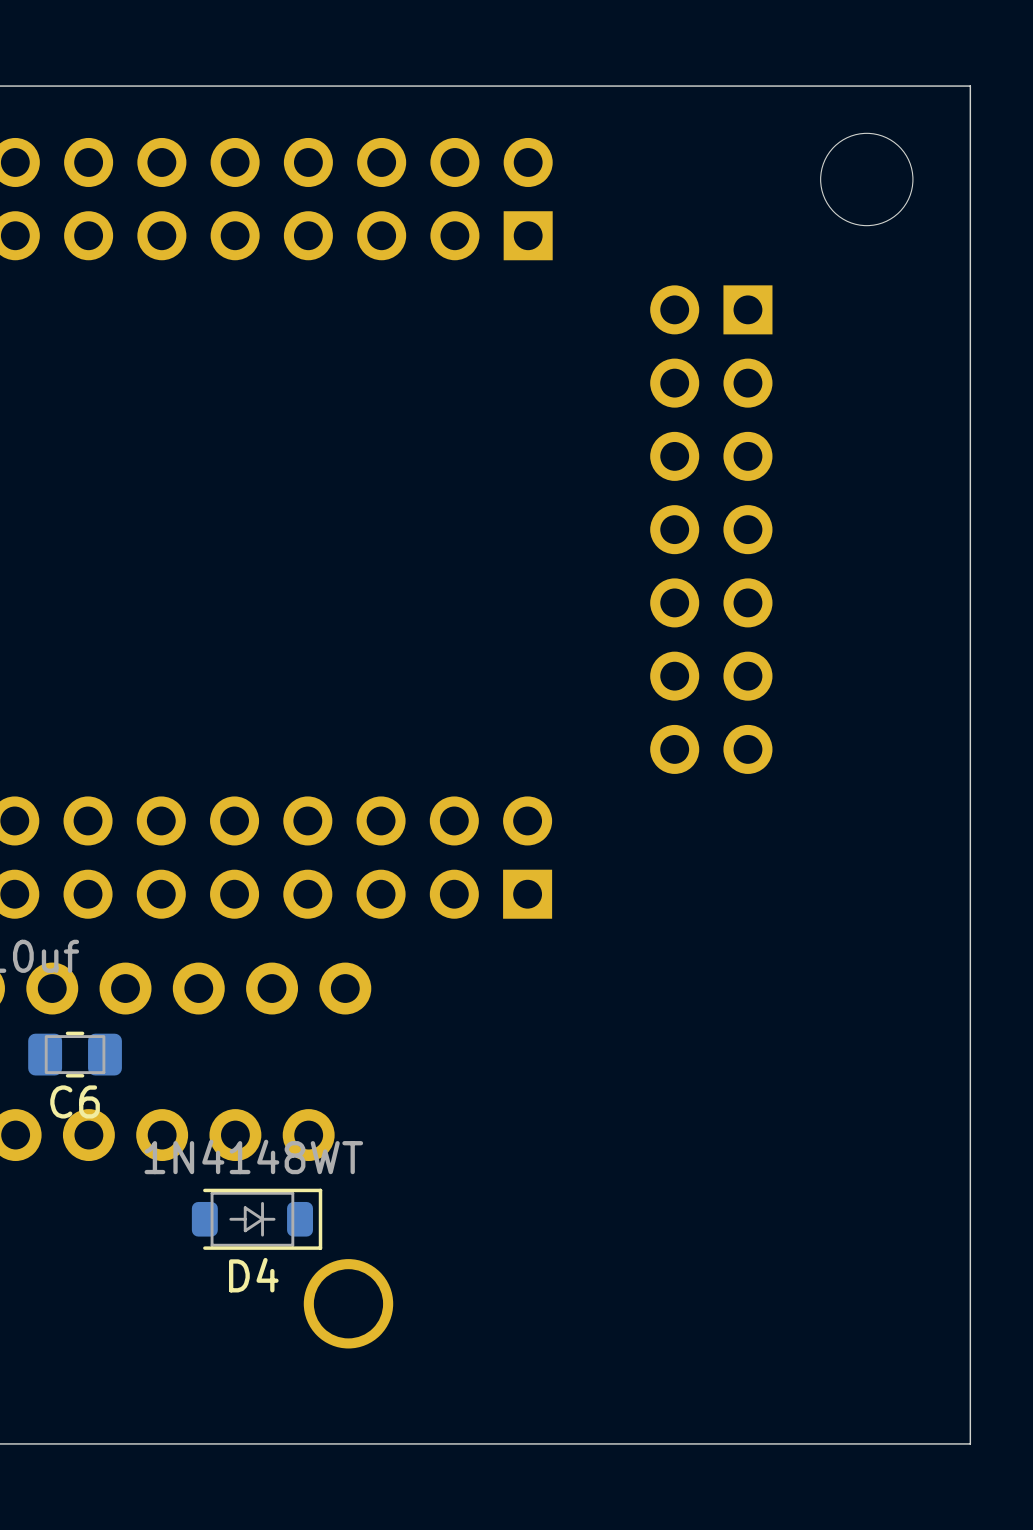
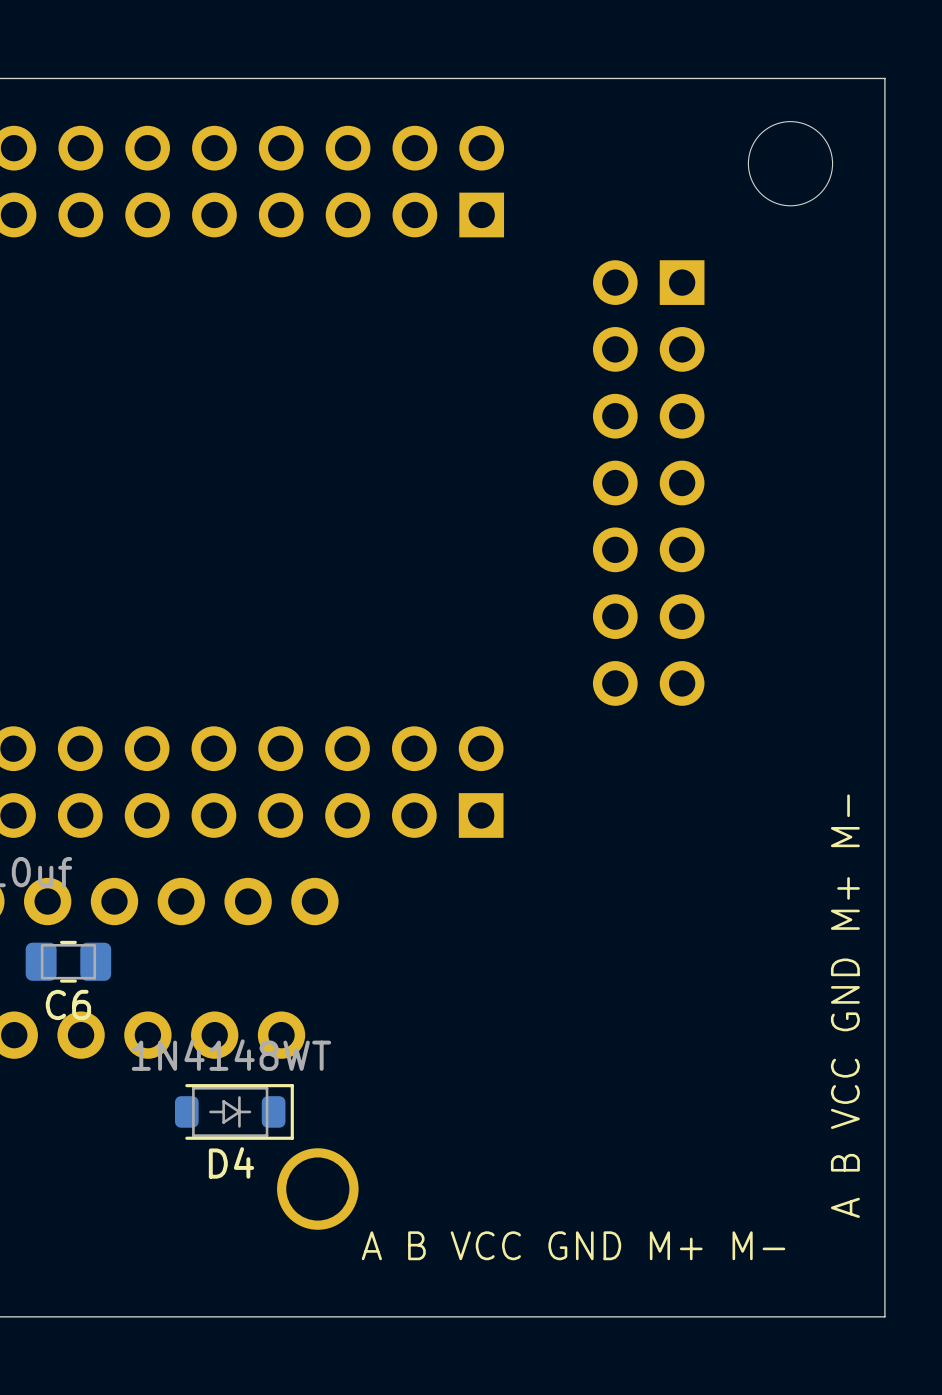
text: none -> A B VCC GND M+ M- (845, 1006)
text: none -> A B VCC GND M+ M- (573, 1245)

